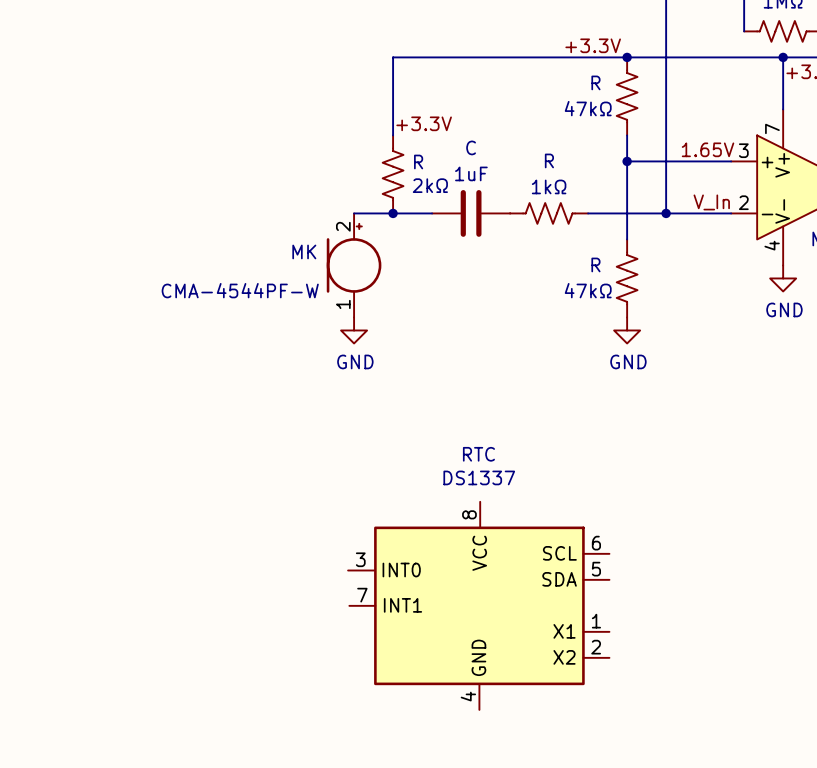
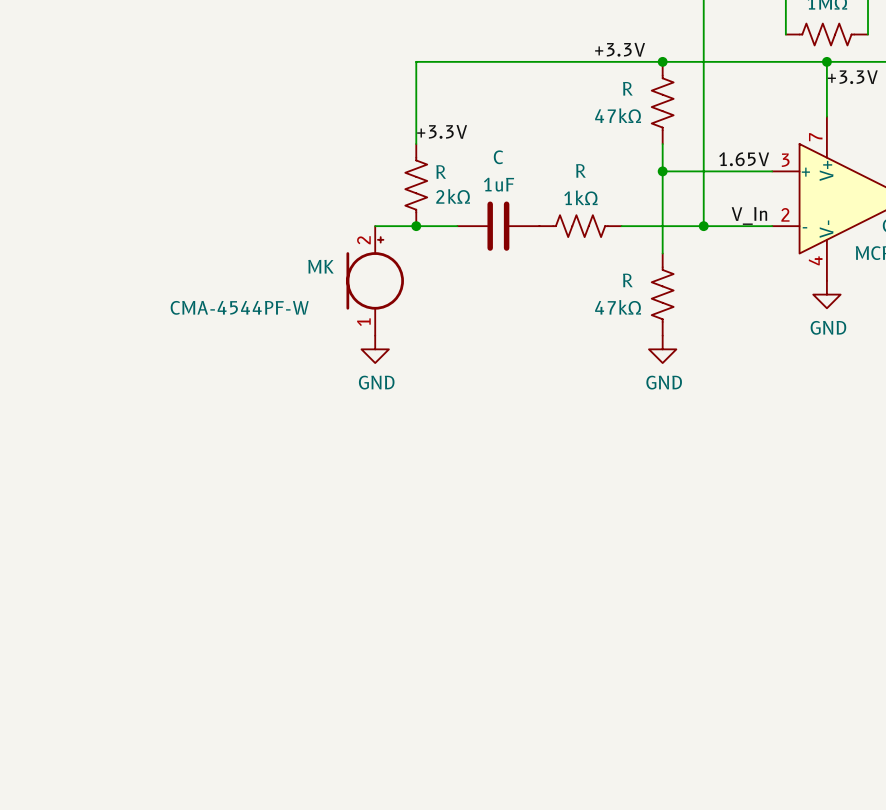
RTC: DS1337 (478, 605) -> none

